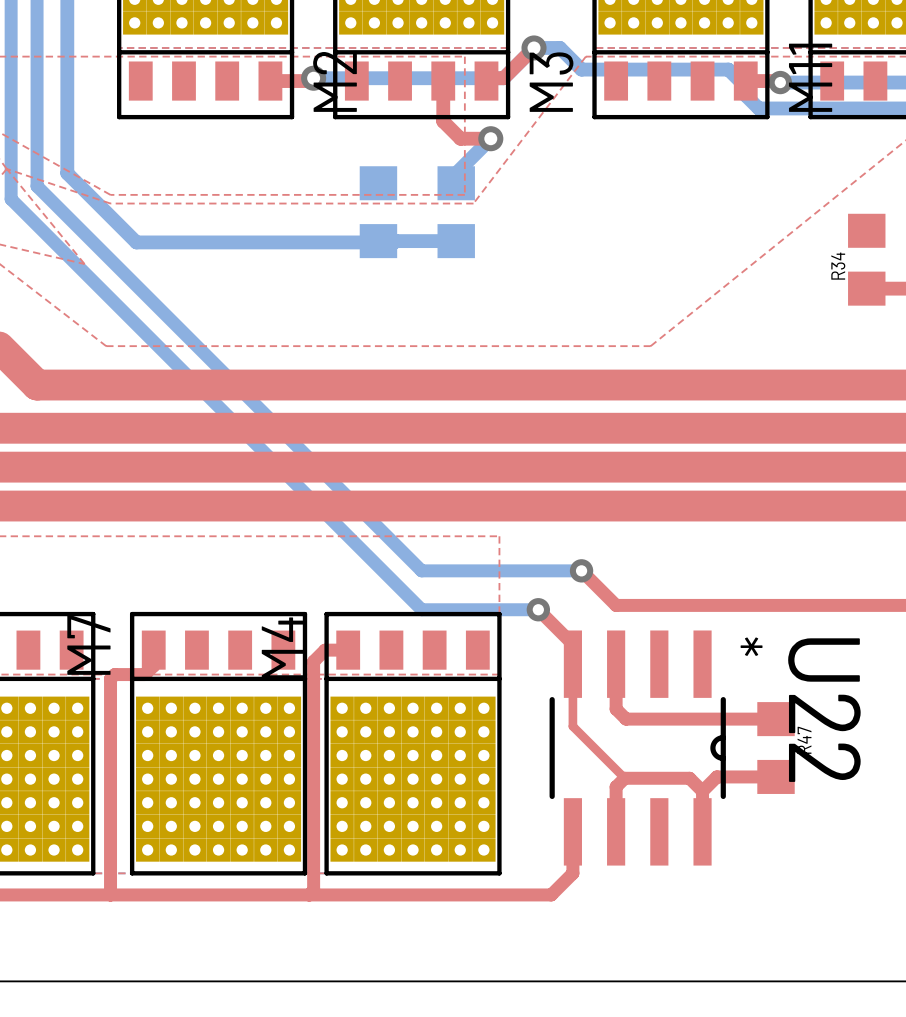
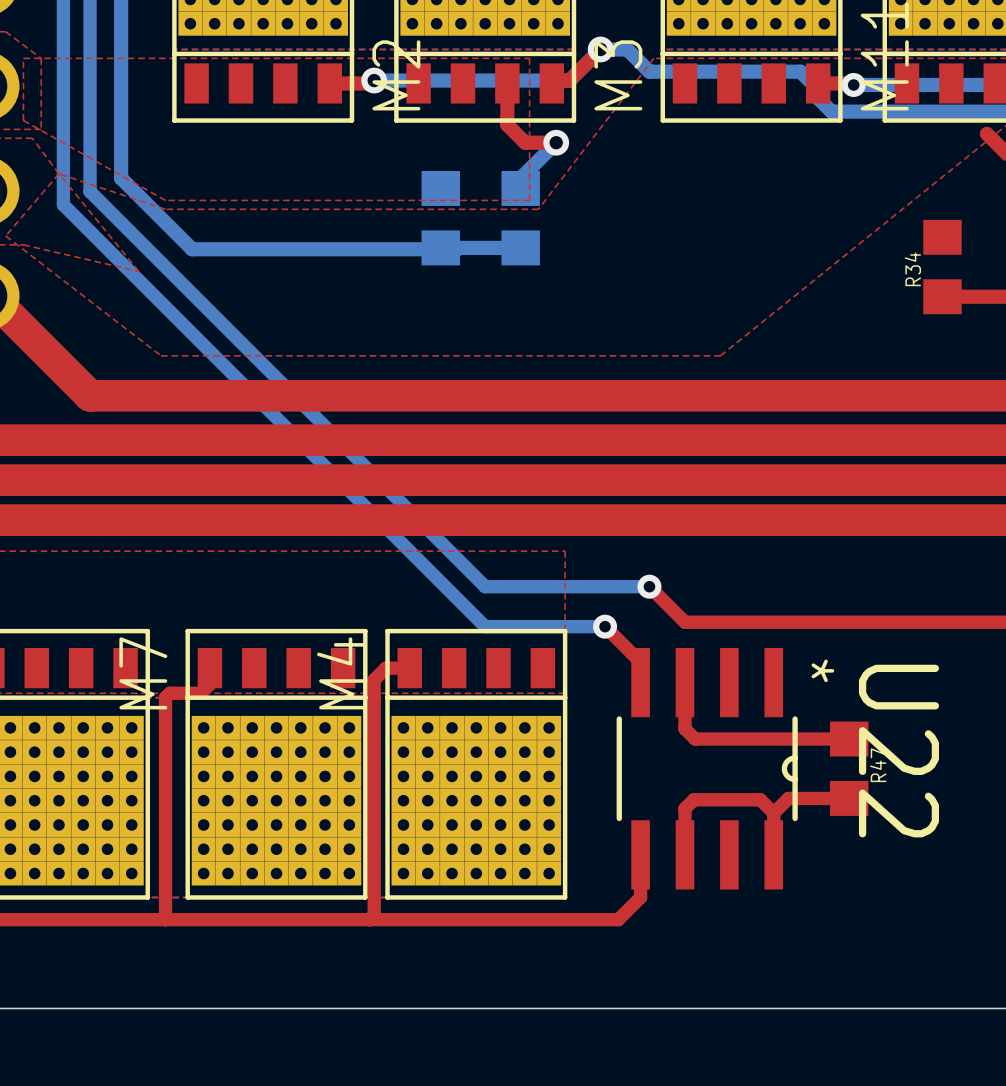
top track: (572, 664) (572, 726) (624, 778) -> none

